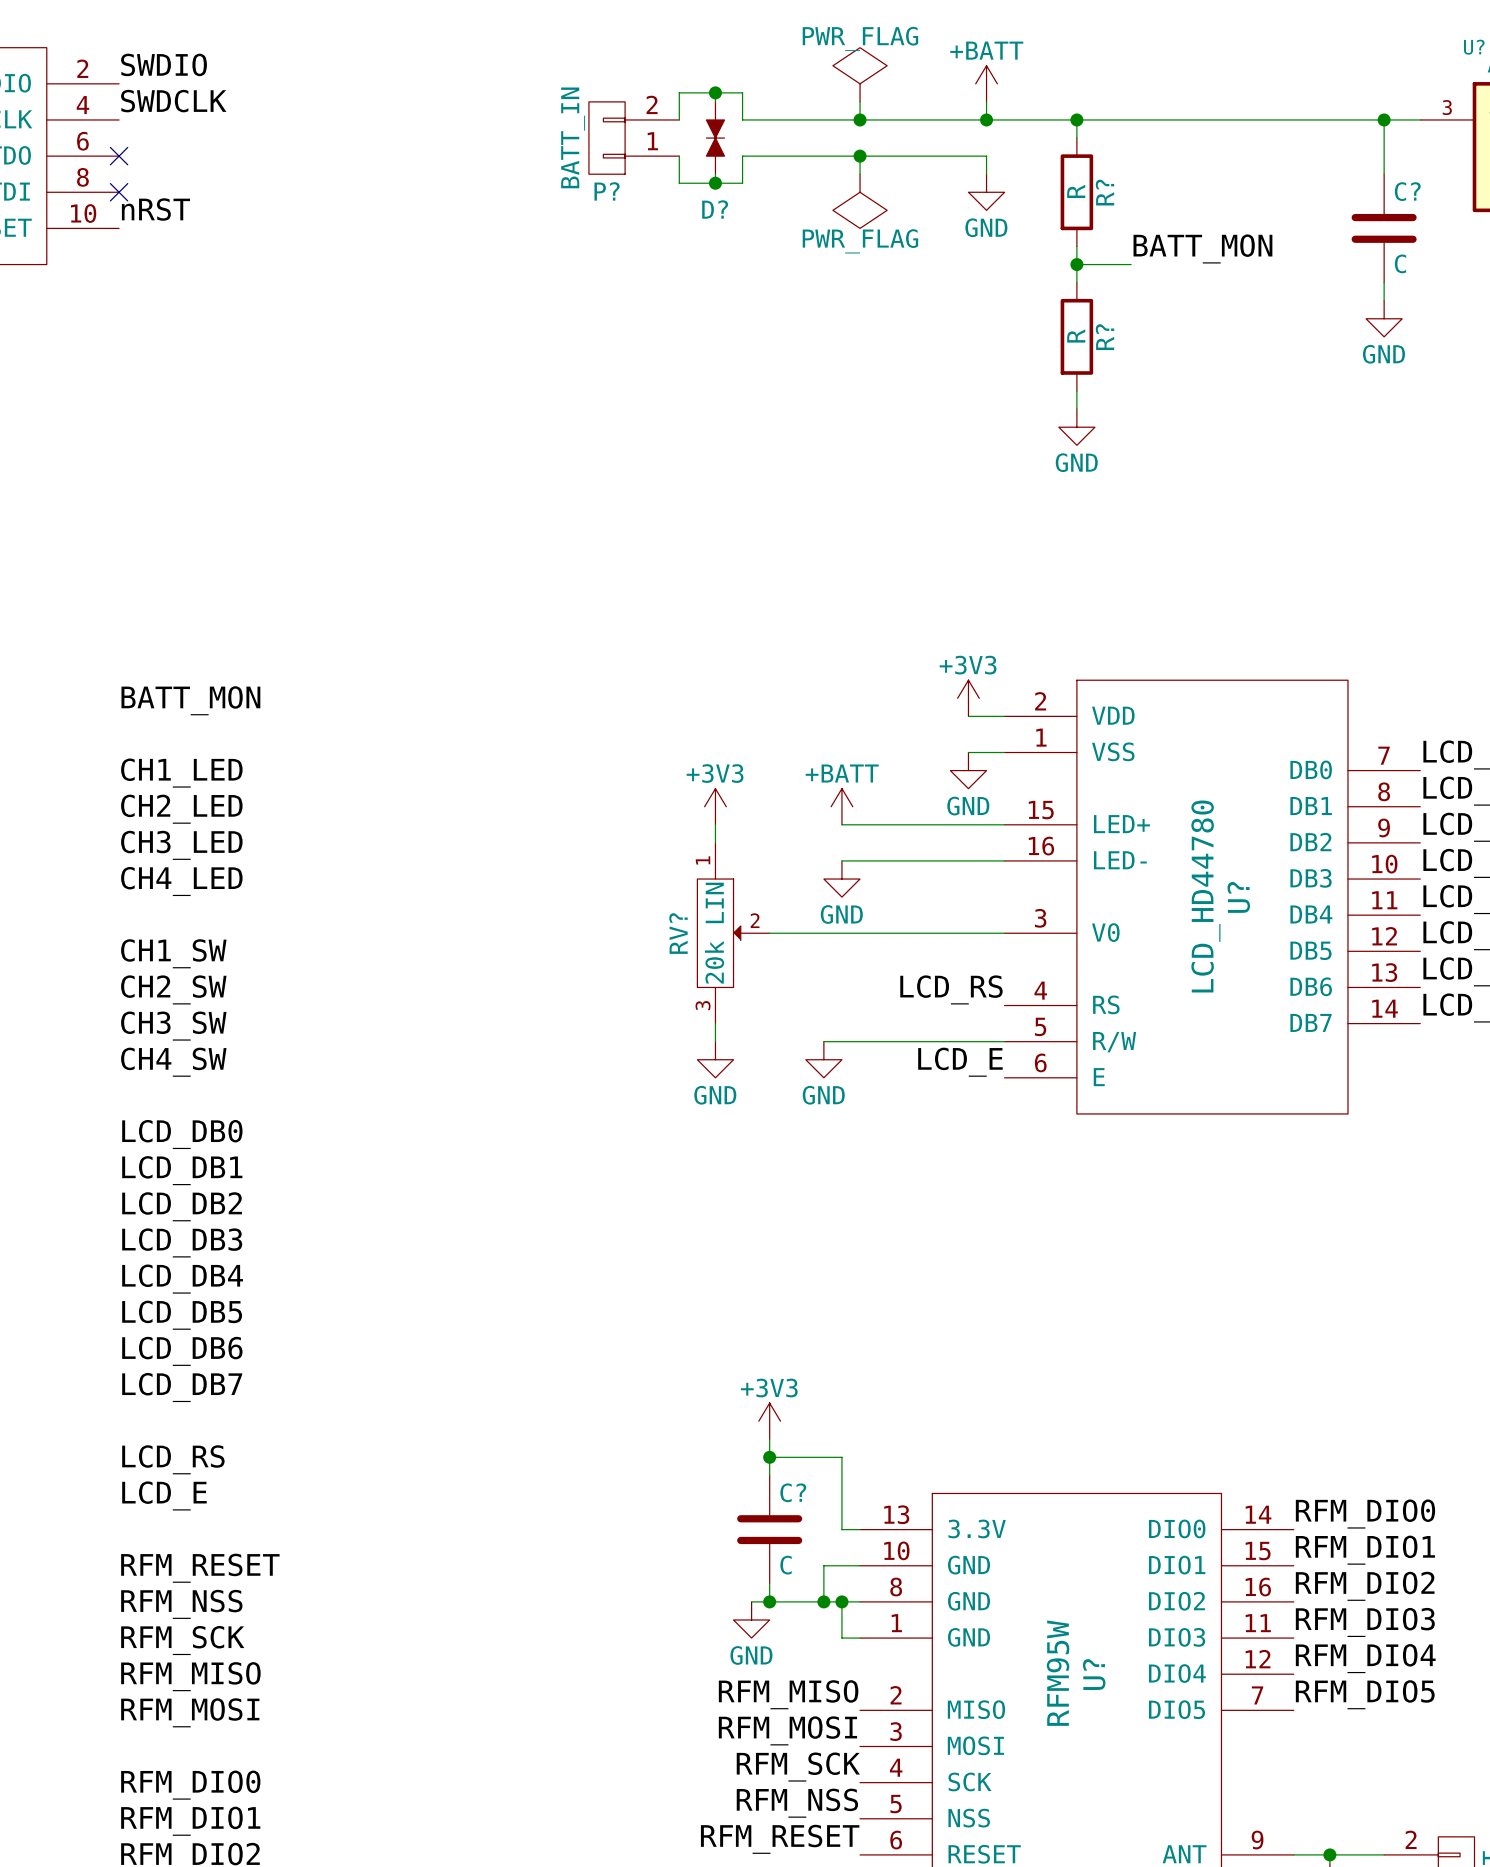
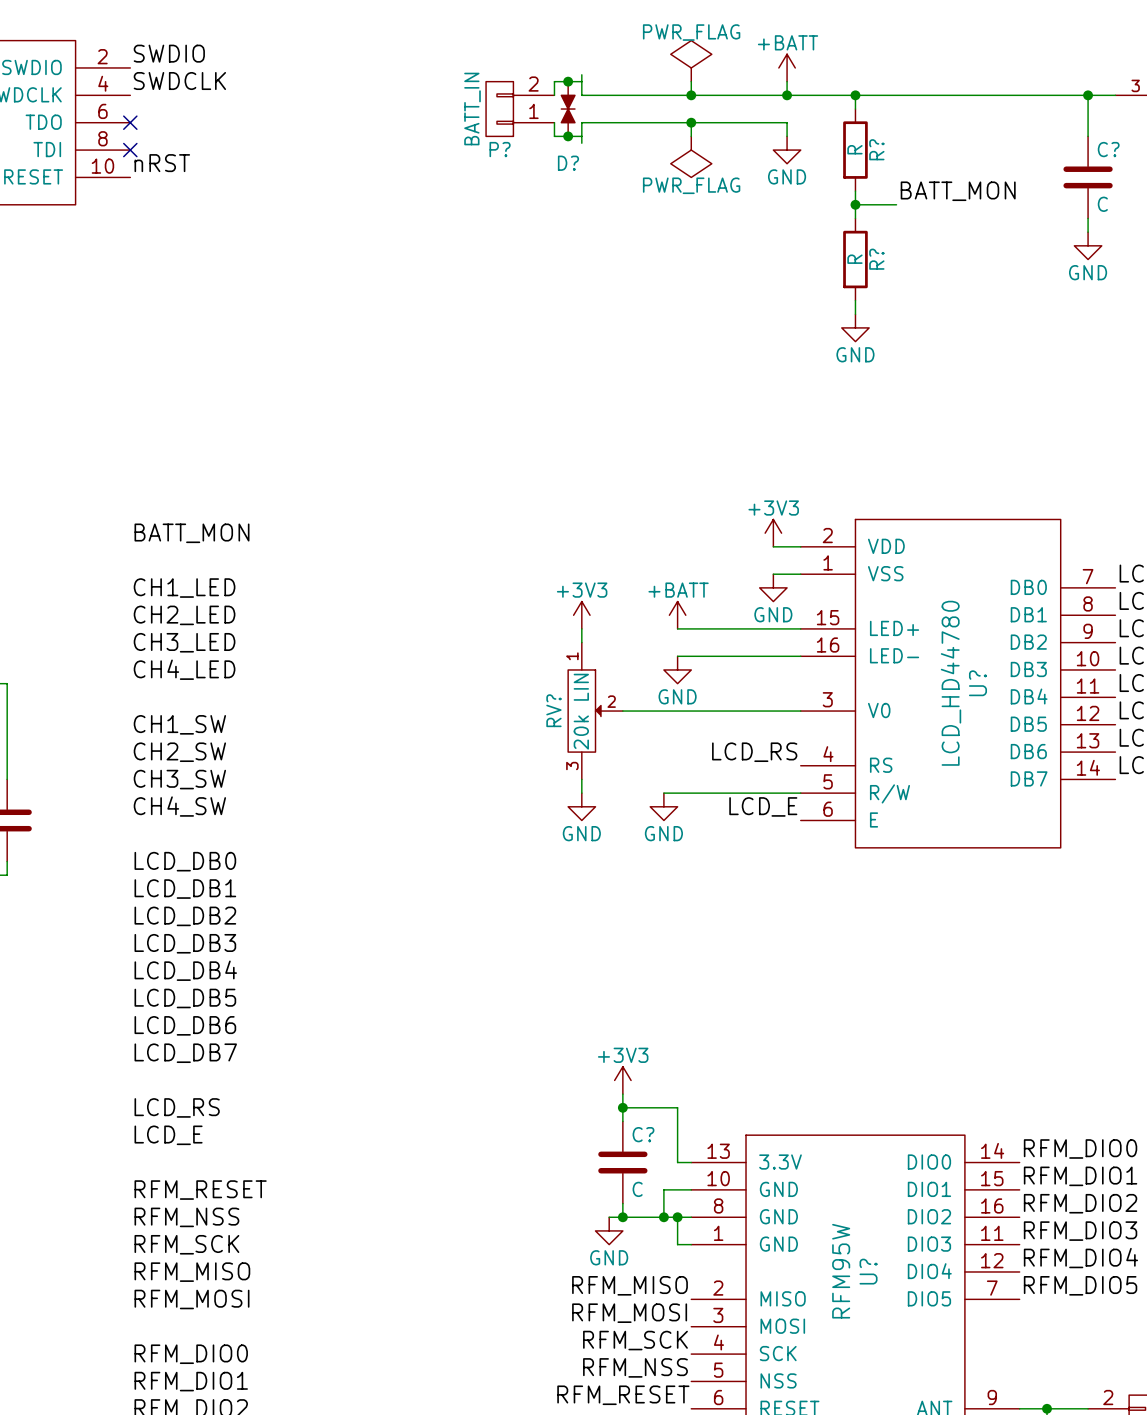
junction position: (715, 92) -> (568, 81)
wire: (679, 101) (679, 92) (742, 92) (742, 119) -> (554, 81) (581, 81) (581, 95) (602, 95)
D? position: (715, 138) -> (568, 109)
wire: (742, 156) (742, 183) (679, 183) (679, 174) -> (602, 122) (581, 122) (581, 136) (554, 136)
junction position: (715, 183) -> (568, 136)

